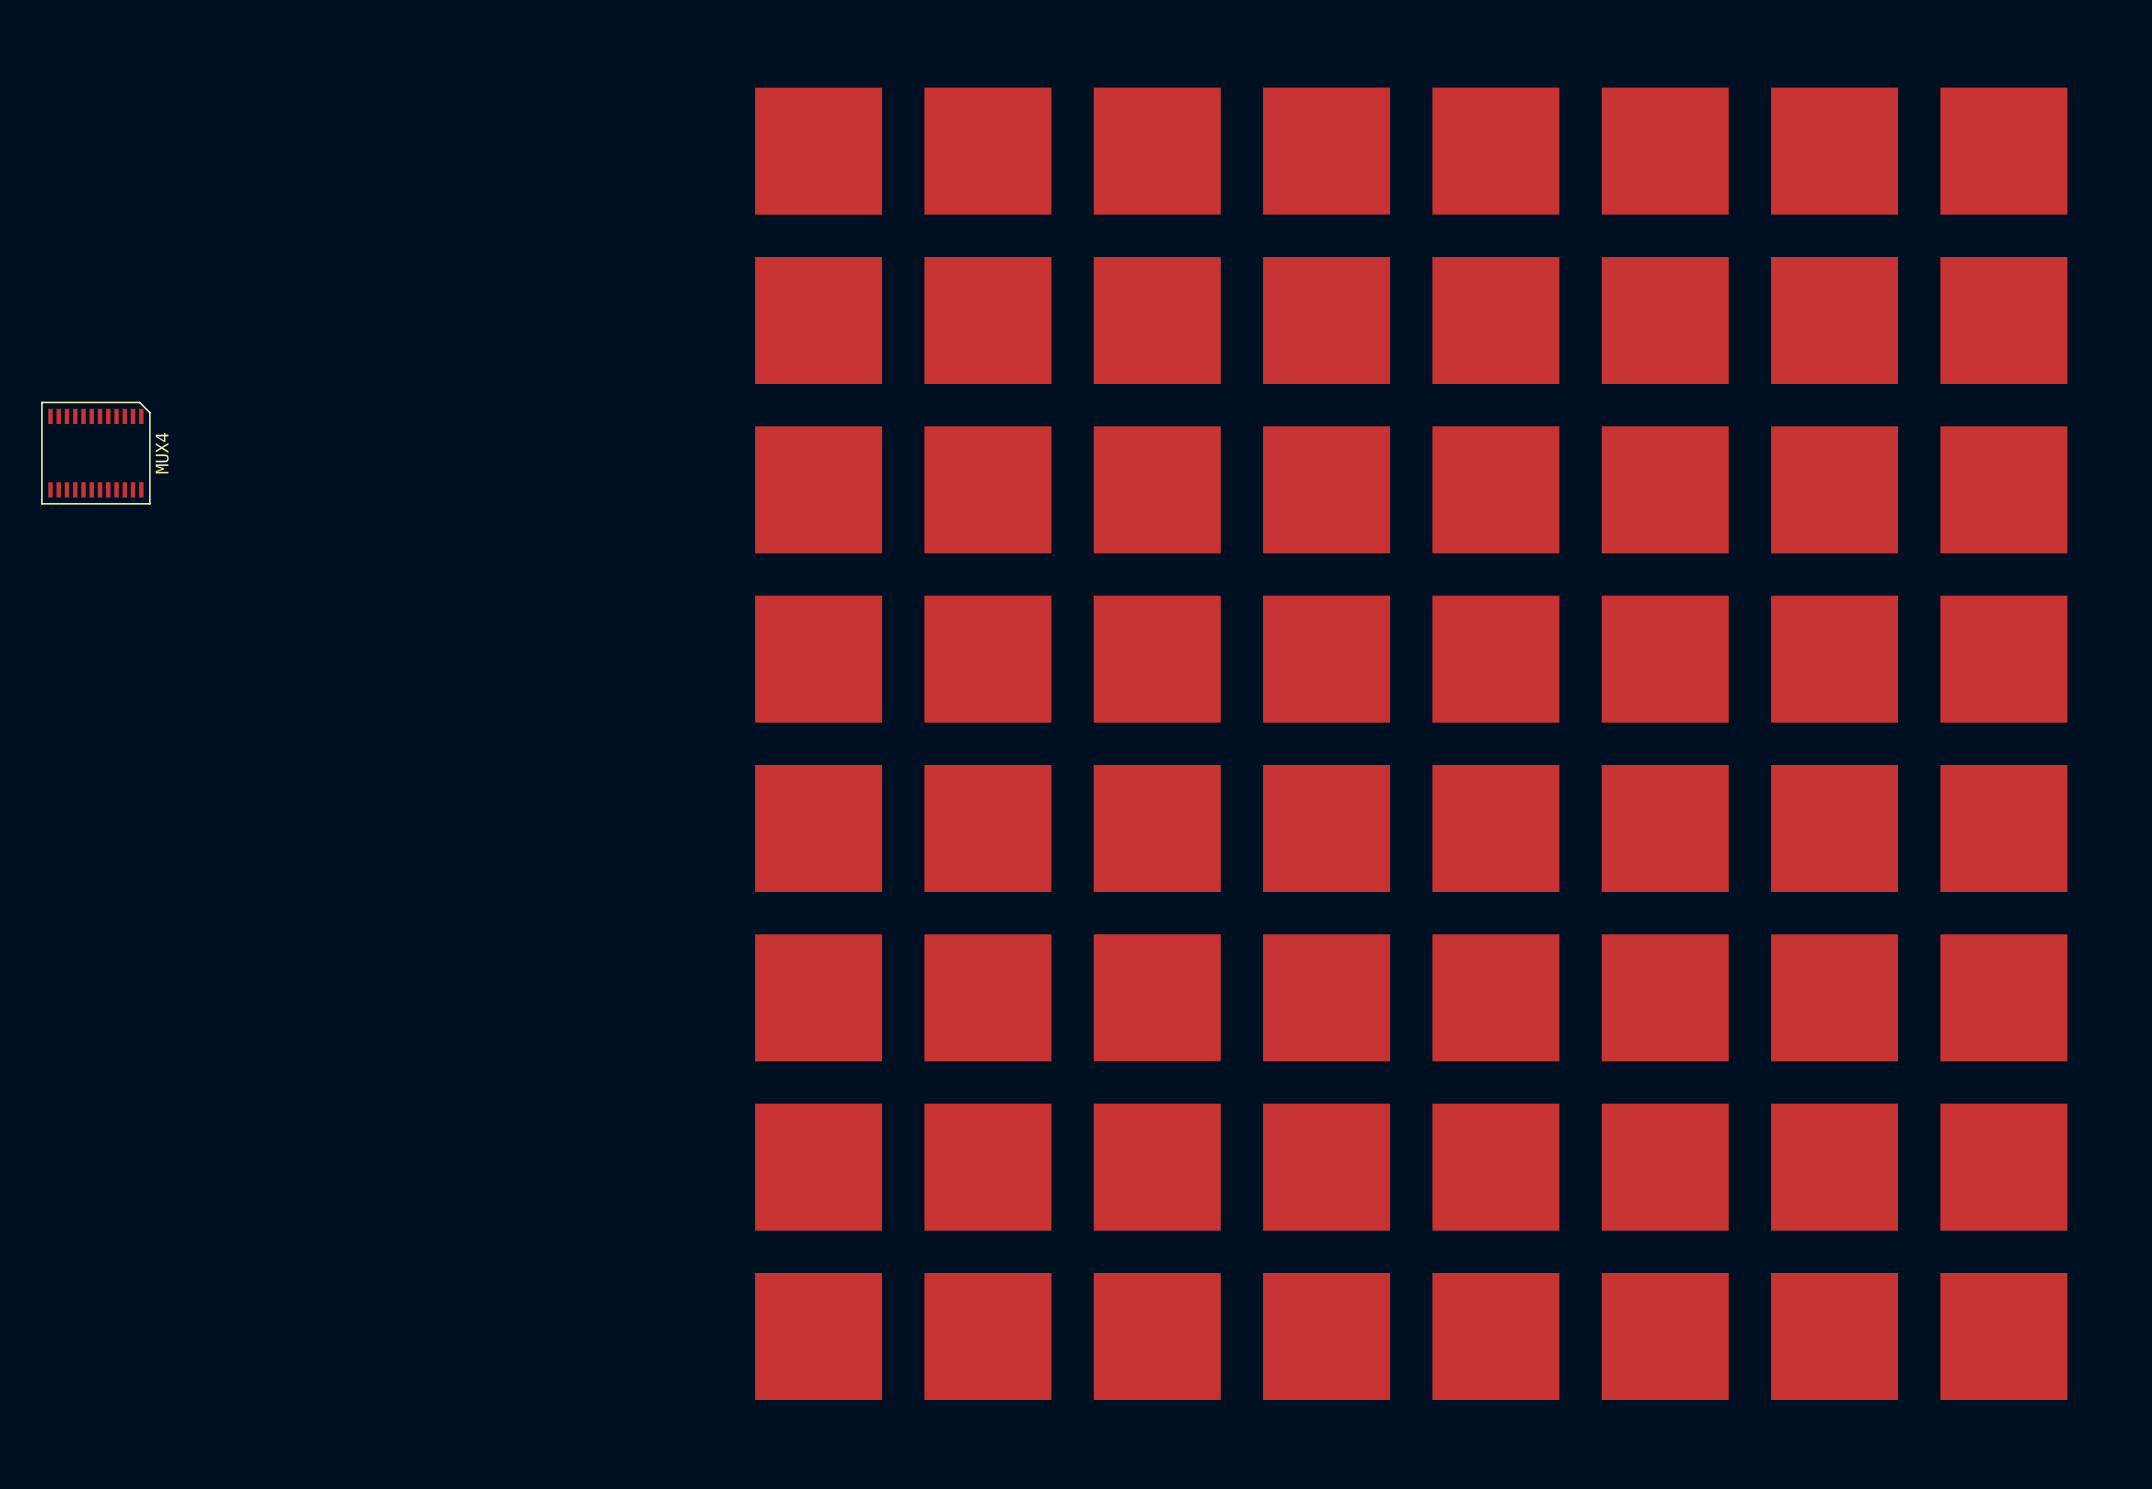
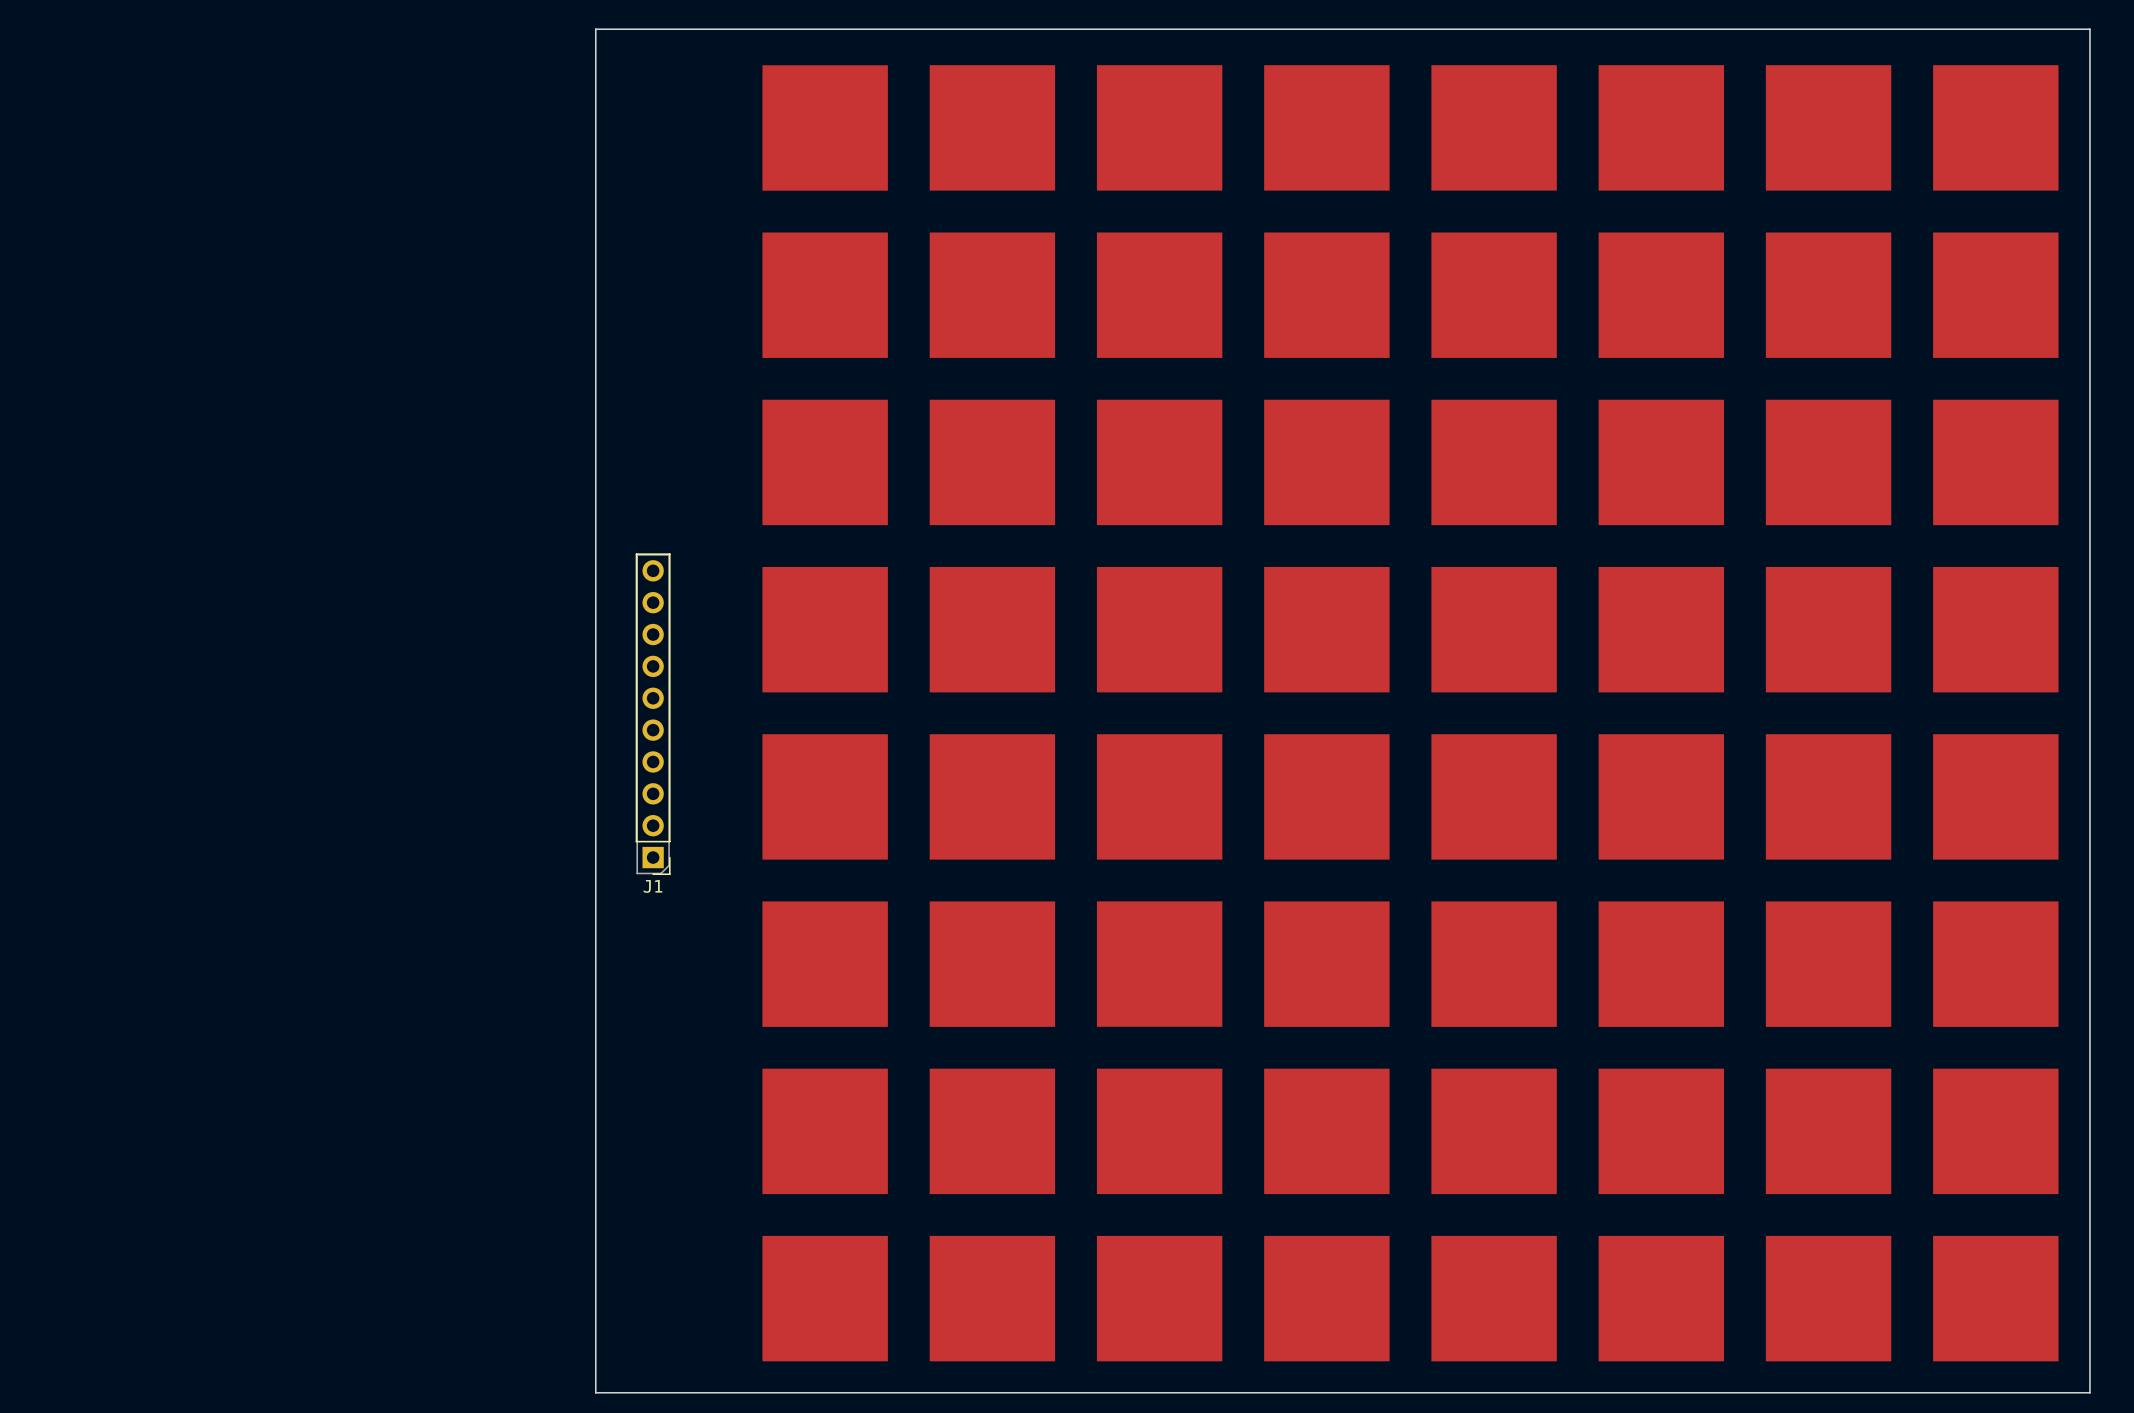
board edge: none -> (595, 29) (2089, 29) (2089, 1392) (595, 1392) (595, 29)
MUX4: (95, 453) -> none
J1: none -> (653, 714)

